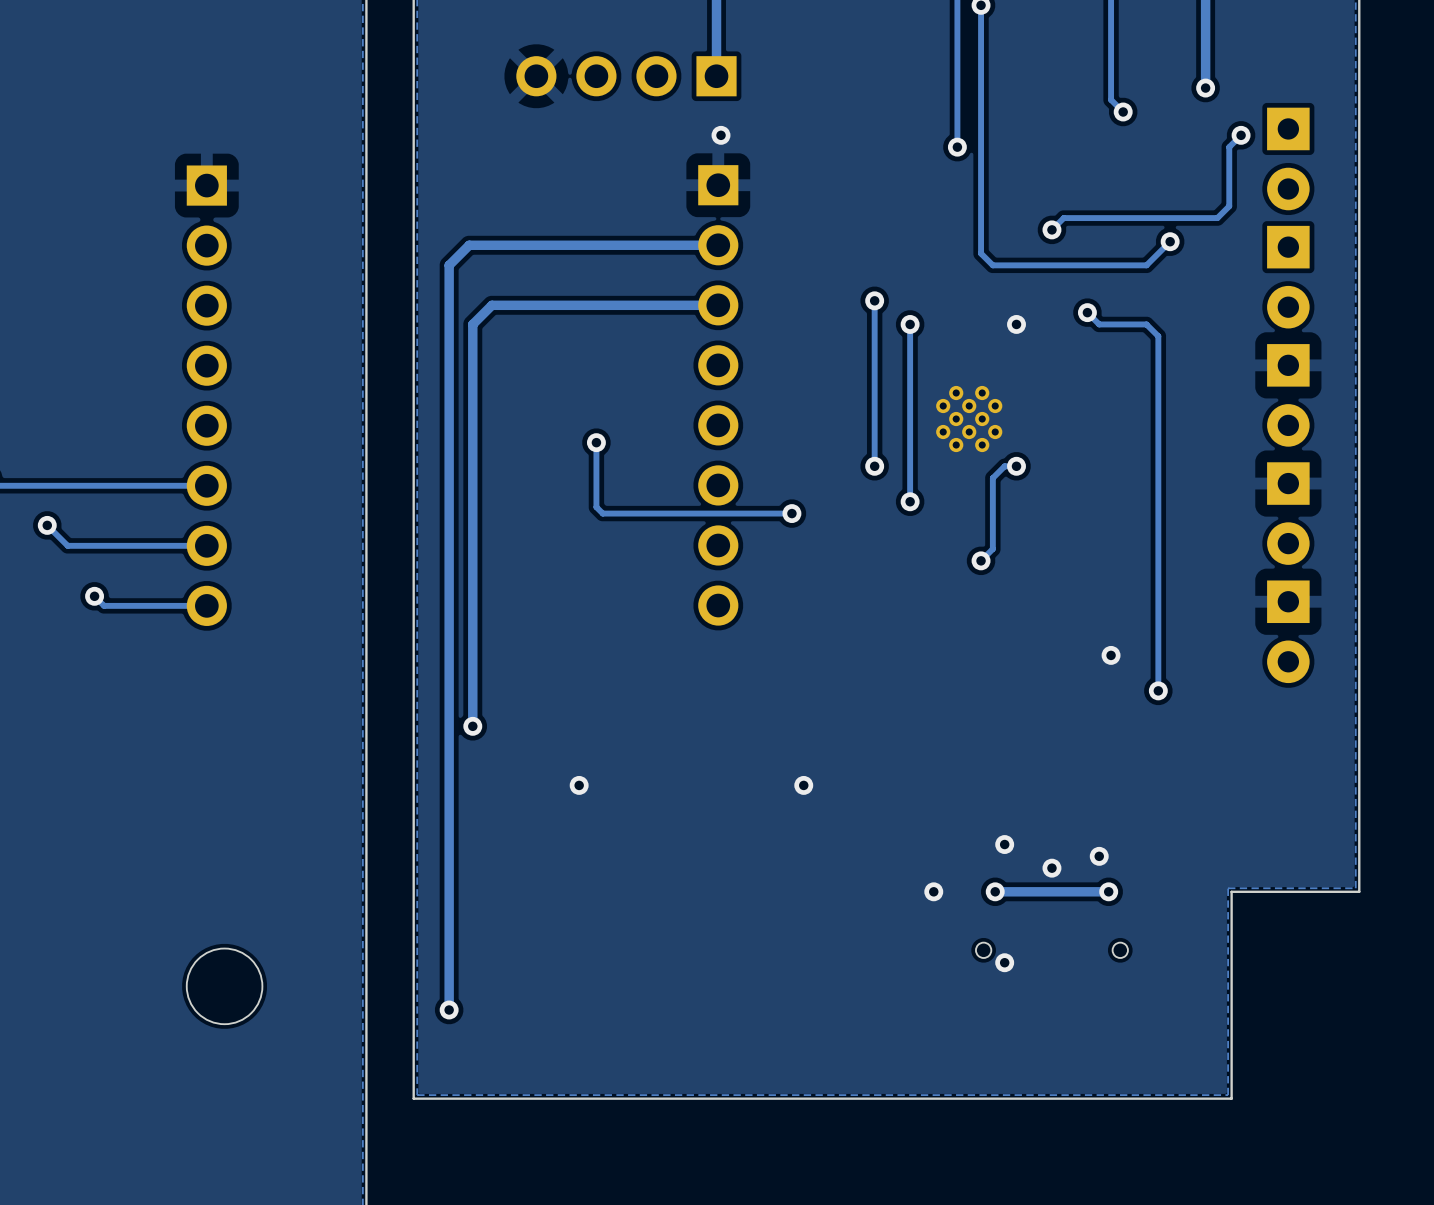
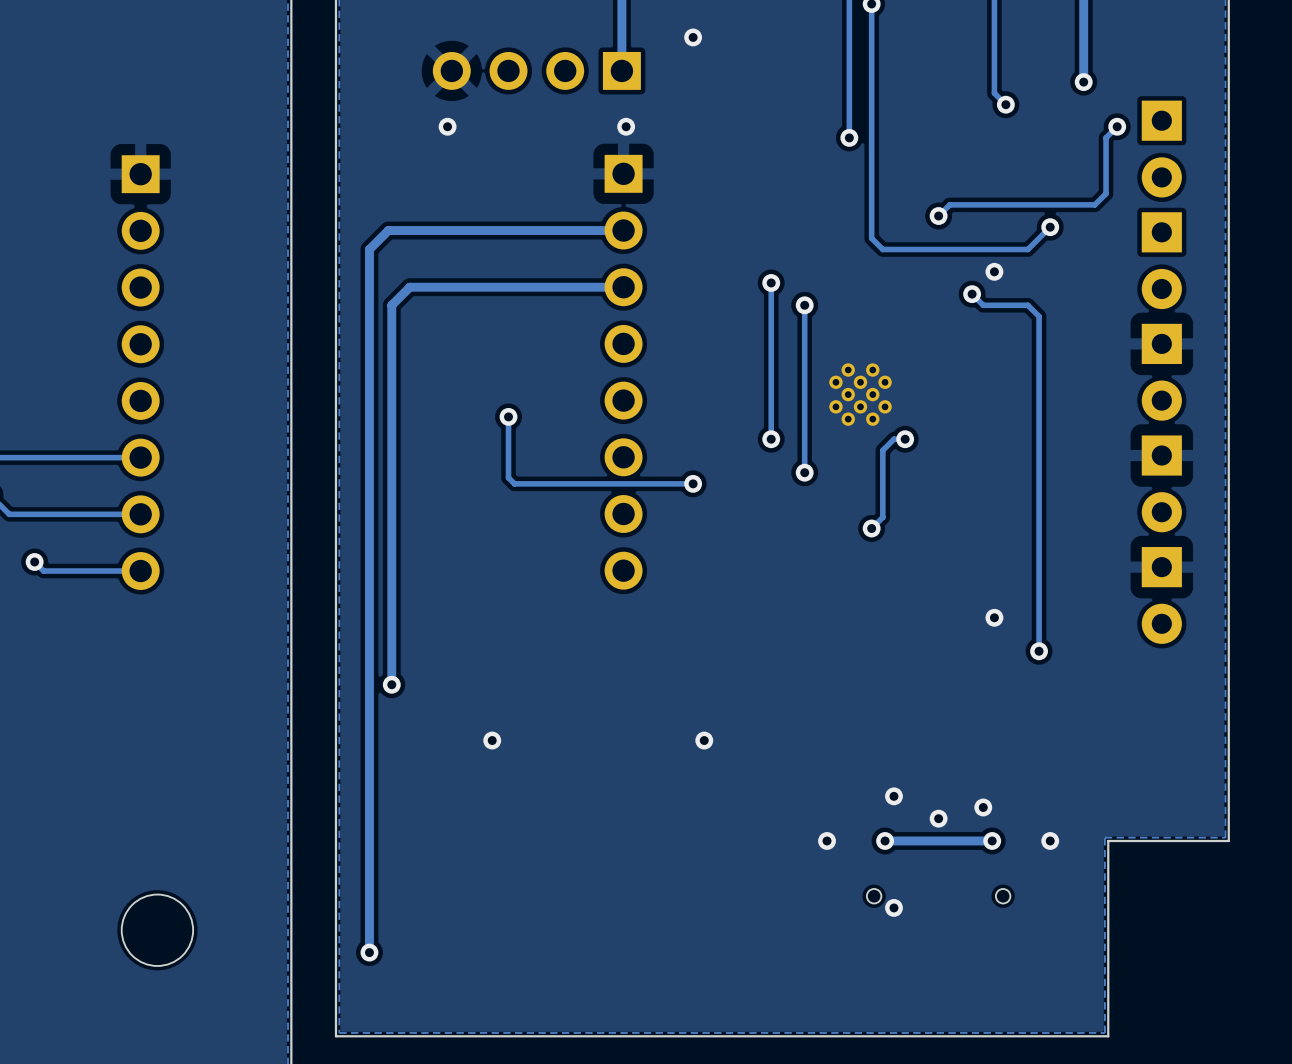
via: none -> (693, 37)
via: none -> (447, 126)
via position: (1016, 324) -> (994, 271)
via: none -> (1050, 840)

